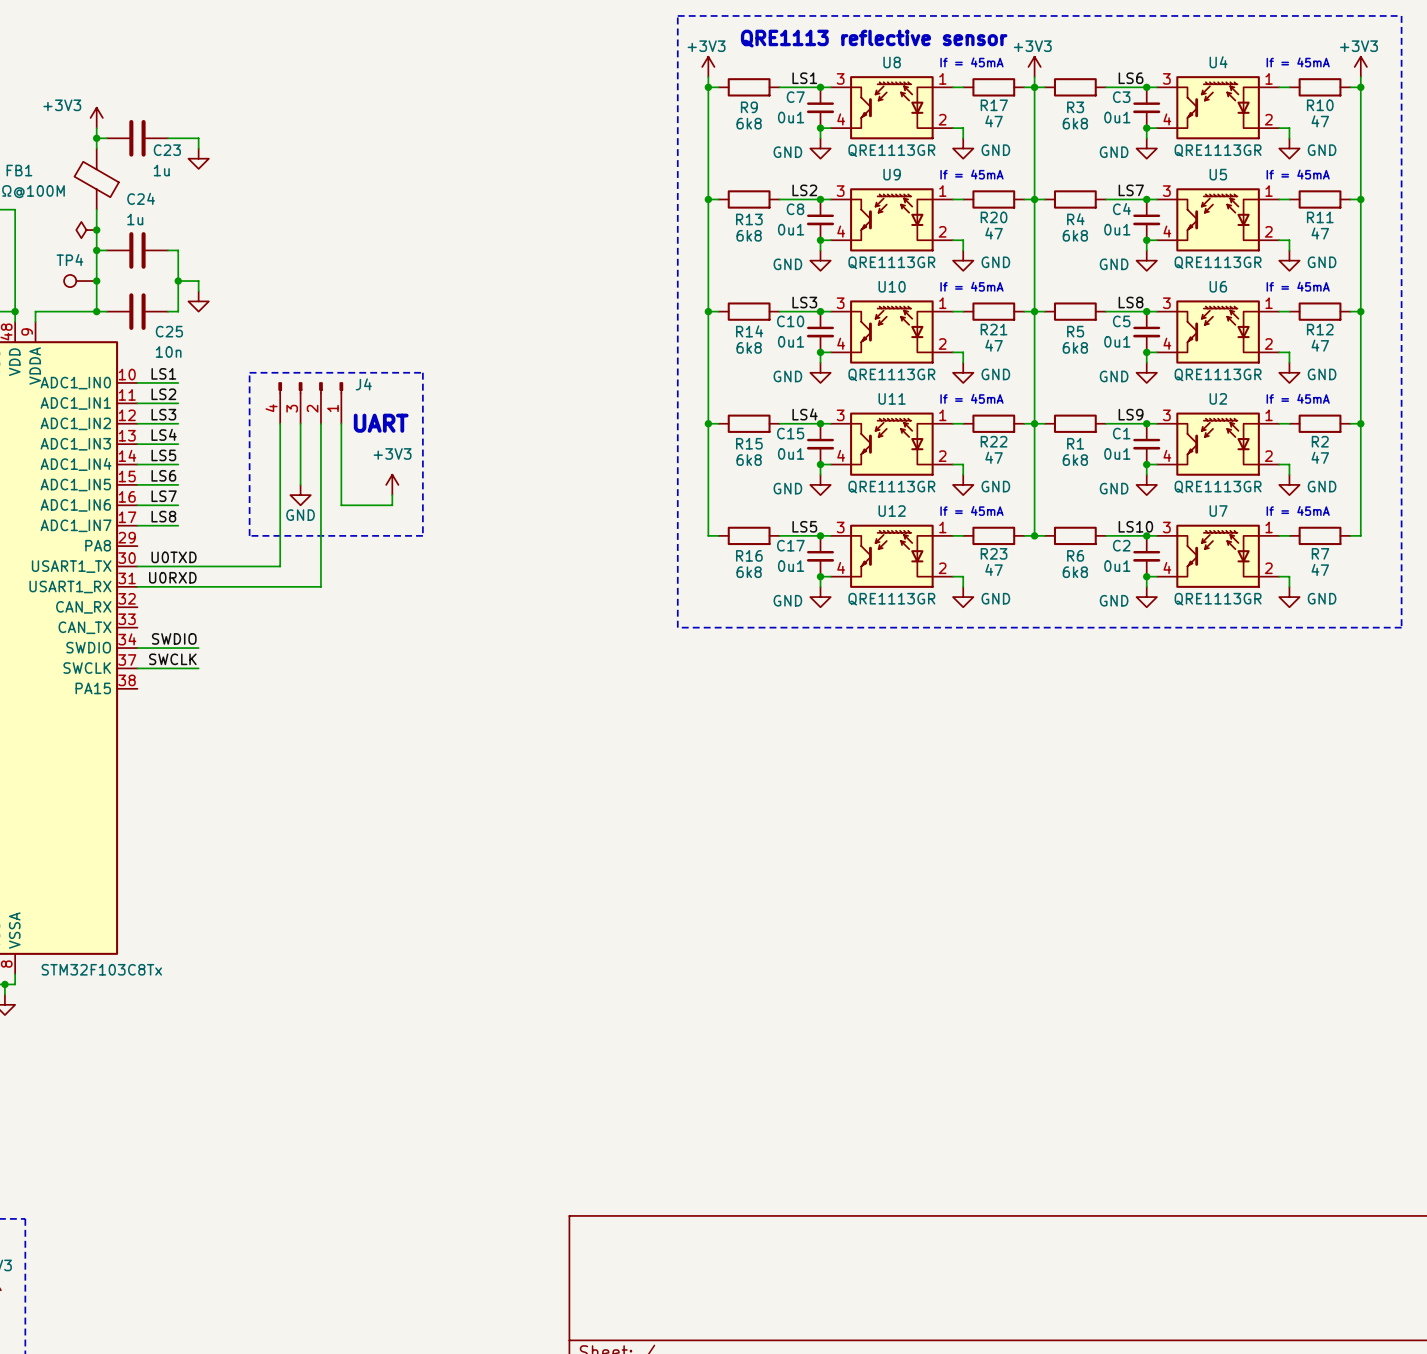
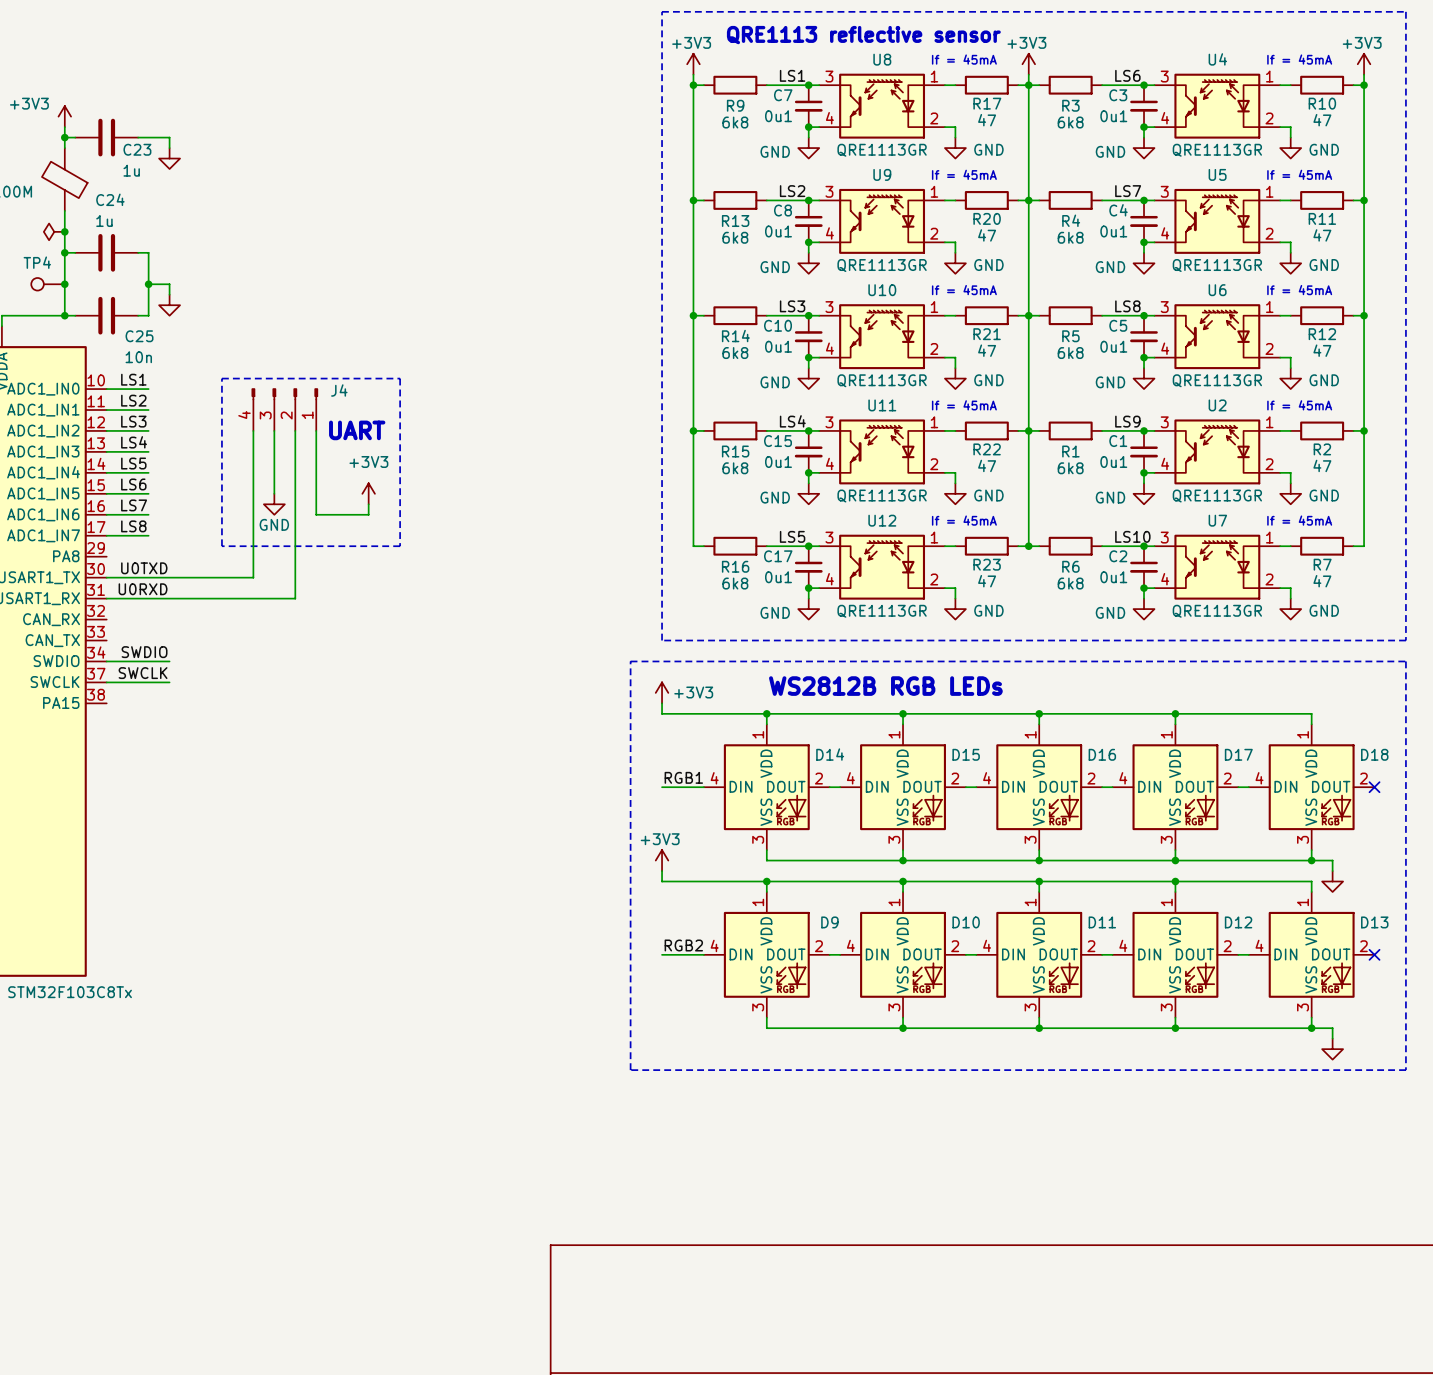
line: none -> (630, 661) (1405, 661) (1405, 1070) (630, 1070) (630, 661)
text: none -> WS2812B RGB LEDs (885, 686)
power symbol: none -> +3V3 (662, 692)
wire: none -> (662, 703) (662, 713) (1311, 713) (1311, 724)
wire: none -> (766, 713) (766, 724)
junction: none -> (766, 713)
wire: none -> (903, 713) (903, 724)
junction: none -> (903, 713)
wire: none -> (1039, 713) (1039, 724)
junction: none -> (1039, 713)
wire: none -> (1175, 713) (1175, 724)
junction: none -> (1175, 713)
label: none -> RGB1 (683, 777)
wire: none -> (662, 787) (703, 787)
D14: none -> (766, 787)
wire: none -> (829, 787) (840, 787)
D15: none -> (903, 787)
wire: none -> (965, 787) (976, 787)
D16: none -> (1039, 787)
wire: none -> (1102, 787) (1112, 787)
D17: none -> (1175, 787)
wire: none -> (1238, 787) (1248, 787)
D18: none -> (1311, 787)
no-connect mark: none -> (1374, 787)
wire: none -> (766, 850) (766, 860) (1332, 860) (1332, 871)
wire: none -> (903, 850) (903, 860)
wire: none -> (1039, 850) (1039, 860)
wire: none -> (1175, 850) (1175, 860)
wire: none -> (1311, 850) (1311, 860)
power symbol: none -> +3V3 (662, 860)
junction: none -> (903, 860)
junction: none -> (1039, 860)
junction: none -> (1175, 860)
junction: none -> (1311, 860)
wire: none -> (662, 871) (662, 881) (1311, 881) (1311, 891)
wire: none -> (766, 881) (766, 891)
junction: none -> (766, 881)
wire: none -> (903, 881) (903, 891)
junction: none -> (903, 881)
wire: none -> (1039, 881) (1039, 891)
junction: none -> (1039, 881)
wire: none -> (1175, 881) (1175, 891)
junction: none -> (1175, 881)
power symbol: none -> (1332, 881)
label: none -> RGB2 (683, 945)
wire: none -> (662, 954) (703, 954)
D9: none -> (766, 954)
wire: none -> (829, 954) (840, 954)
D10: none -> (903, 954)
wire: none -> (965, 954) (976, 954)
D11: none -> (1039, 954)
wire: none -> (1102, 954) (1112, 954)
D12: none -> (1175, 954)
wire: none -> (1238, 954) (1248, 954)
D13: none -> (1311, 954)
no-connect mark: none -> (1374, 954)
wire: none -> (766, 1017) (766, 1028) (1332, 1028) (1332, 1038)
wire: none -> (903, 1017) (903, 1028)
wire: none -> (1039, 1017) (1039, 1028)
wire: none -> (1175, 1017) (1175, 1028)
wire: none -> (1311, 1017) (1311, 1028)
junction: none -> (903, 1028)
junction: none -> (1039, 1028)
junction: none -> (1175, 1028)
junction: none -> (1311, 1028)
power symbol: none -> (1332, 1049)

